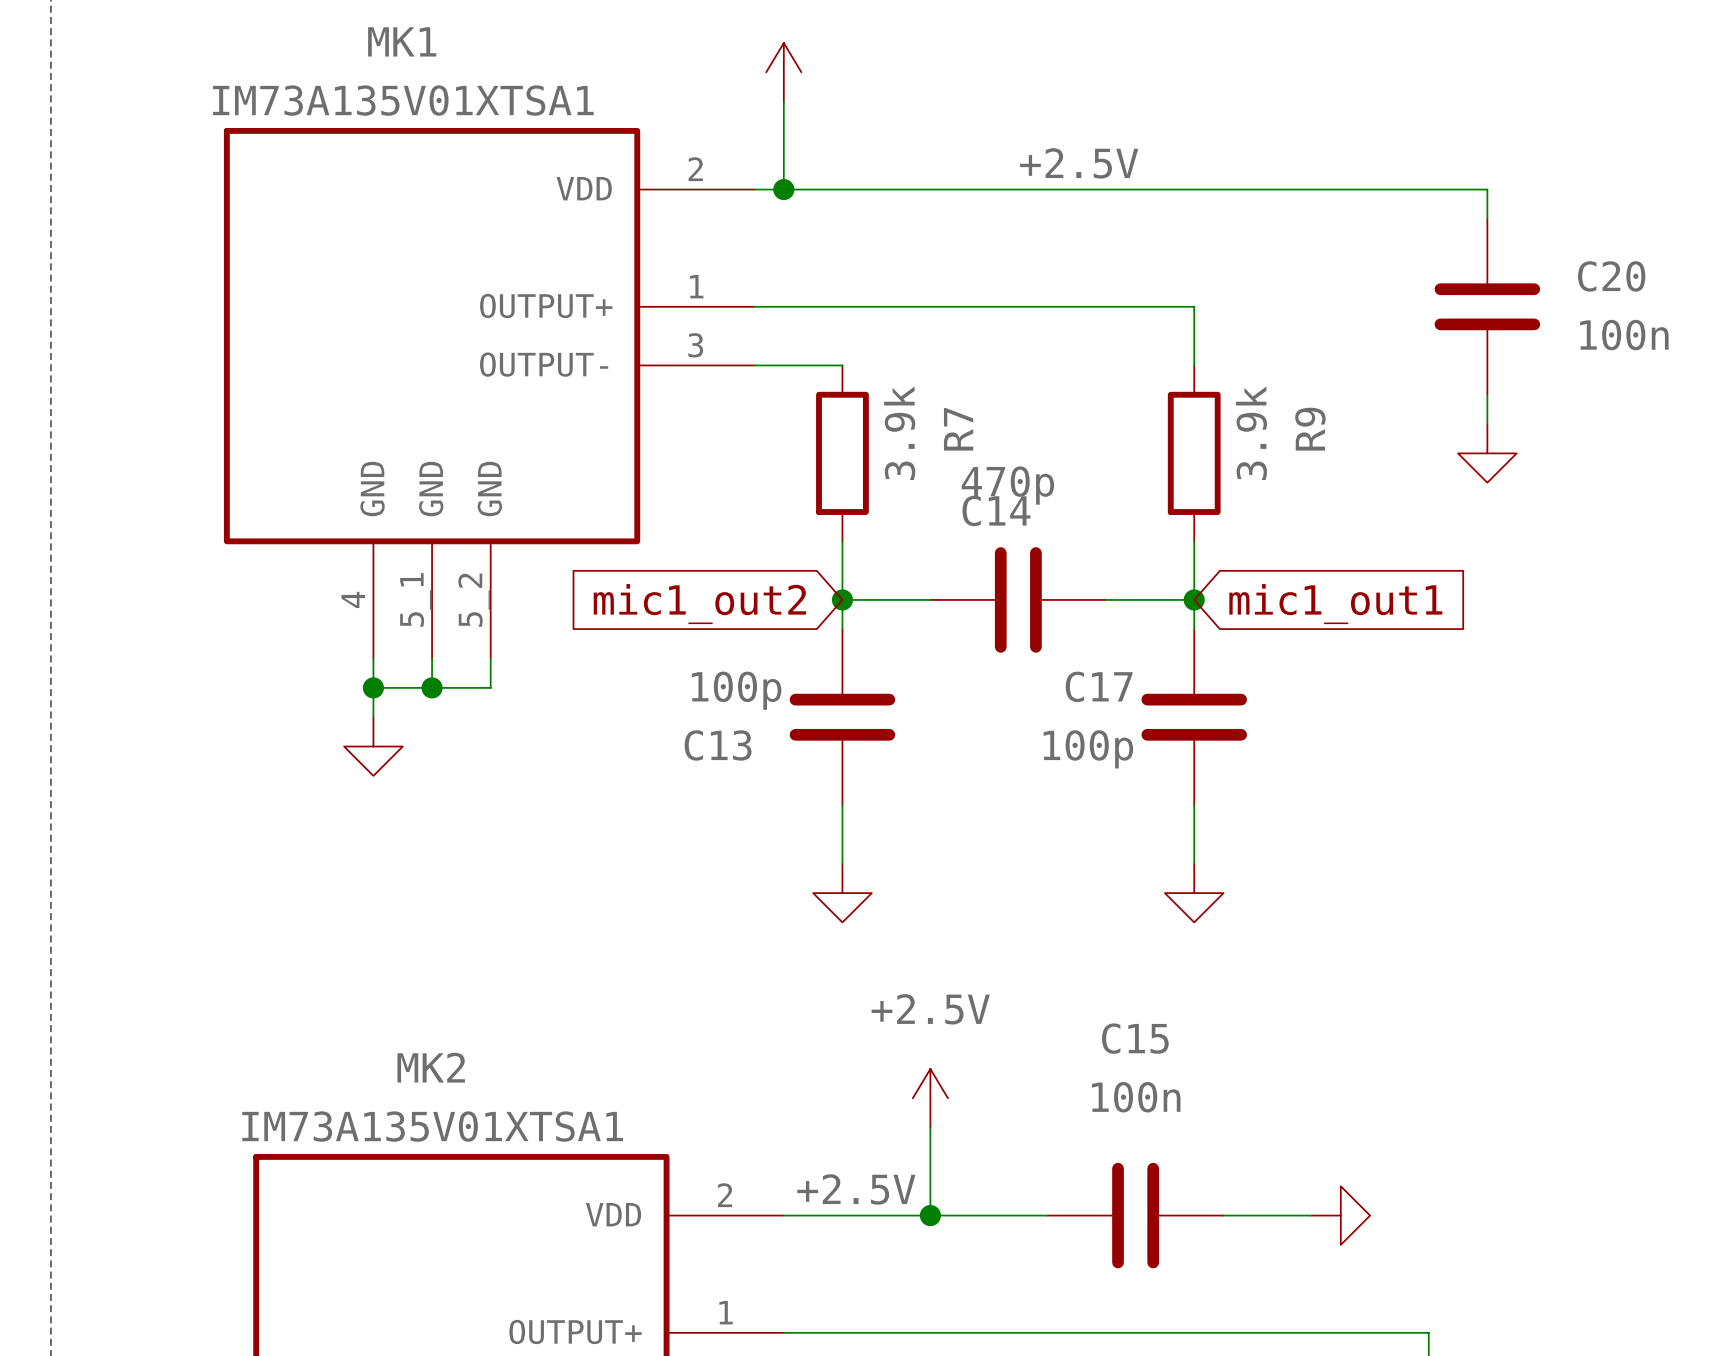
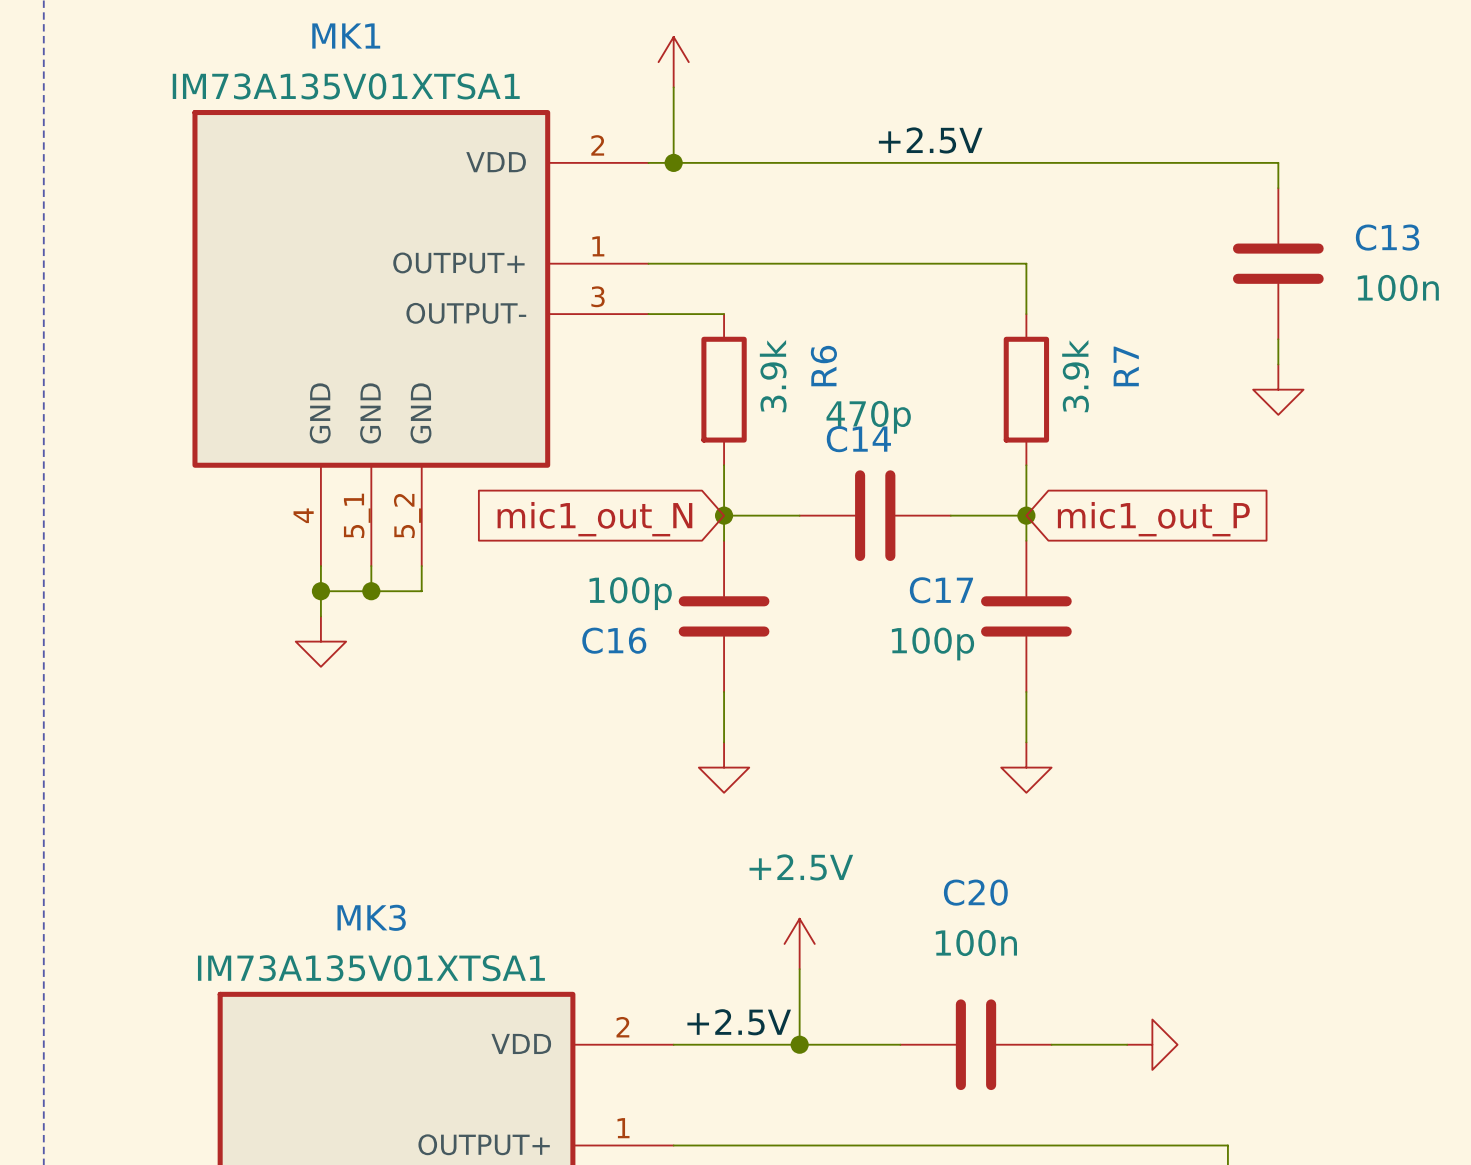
C20 name: C20 (1611, 276) -> C13 (1387, 237)
R7 name: R7 (958, 429) -> R6 (823, 366)
R9 name: R9 (1310, 429) -> R7 (1126, 366)
global label: mic1_out2 (699, 604) -> mic1_out_N (594, 519)
global label: mic1_out1 (1335, 604) -> mic1_out_P (1153, 519)
C13 name: C13 (718, 745) -> C16 (614, 640)
C15 name: C15 (1135, 1038) -> C20 (975, 892)
MK2 name: MK2 (431, 1067) -> MK3 (371, 917)

